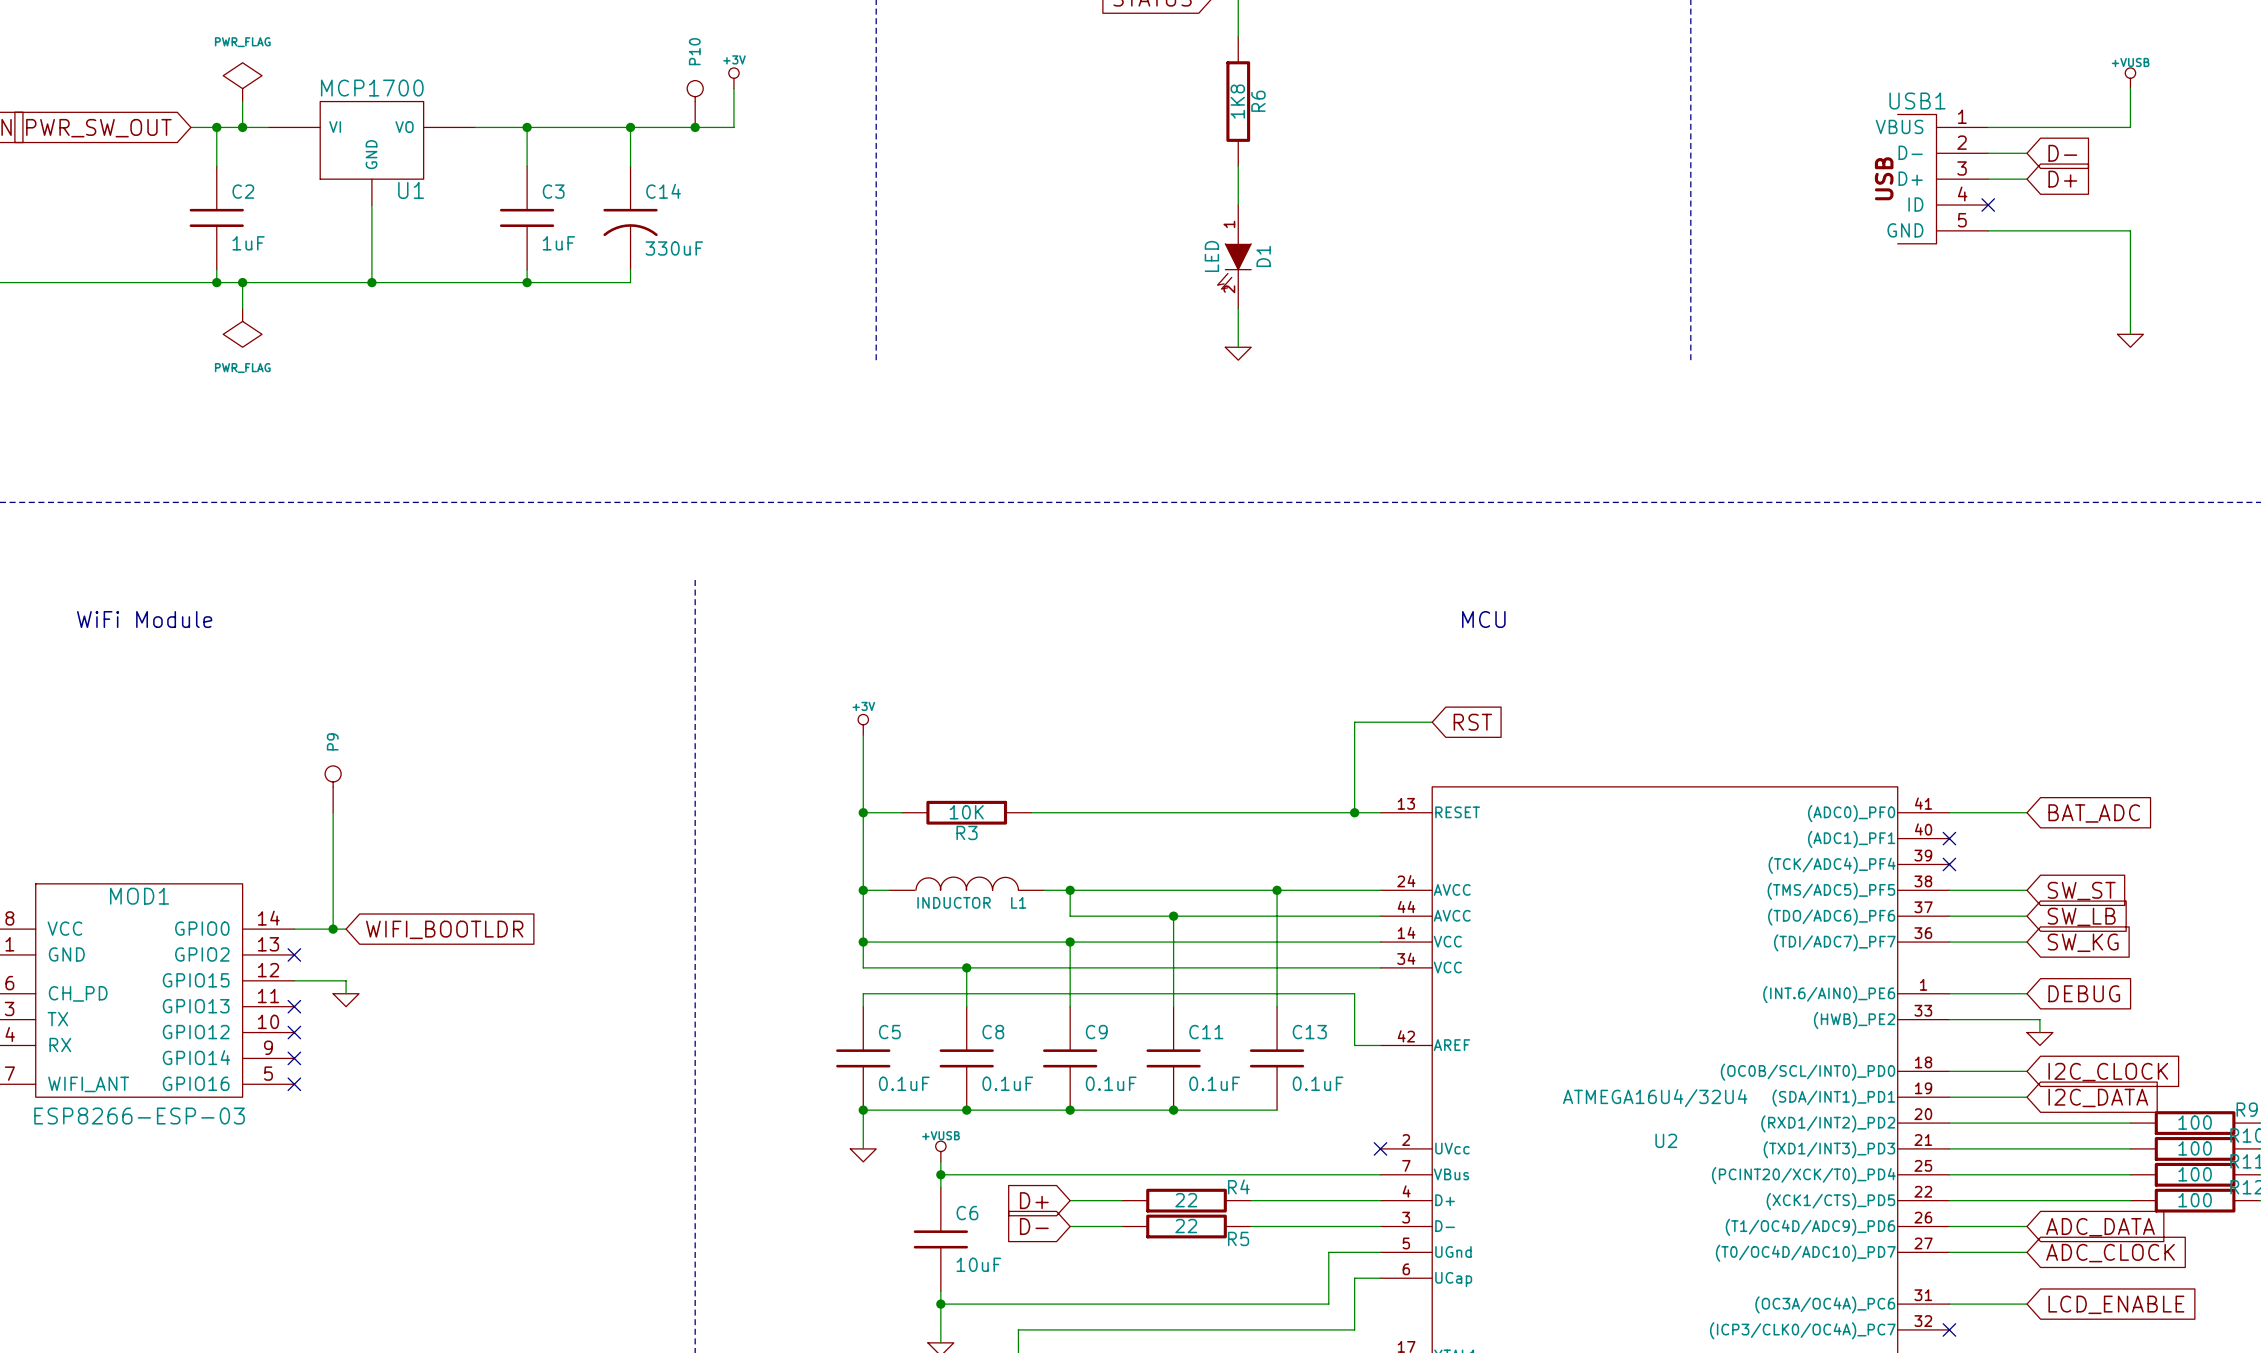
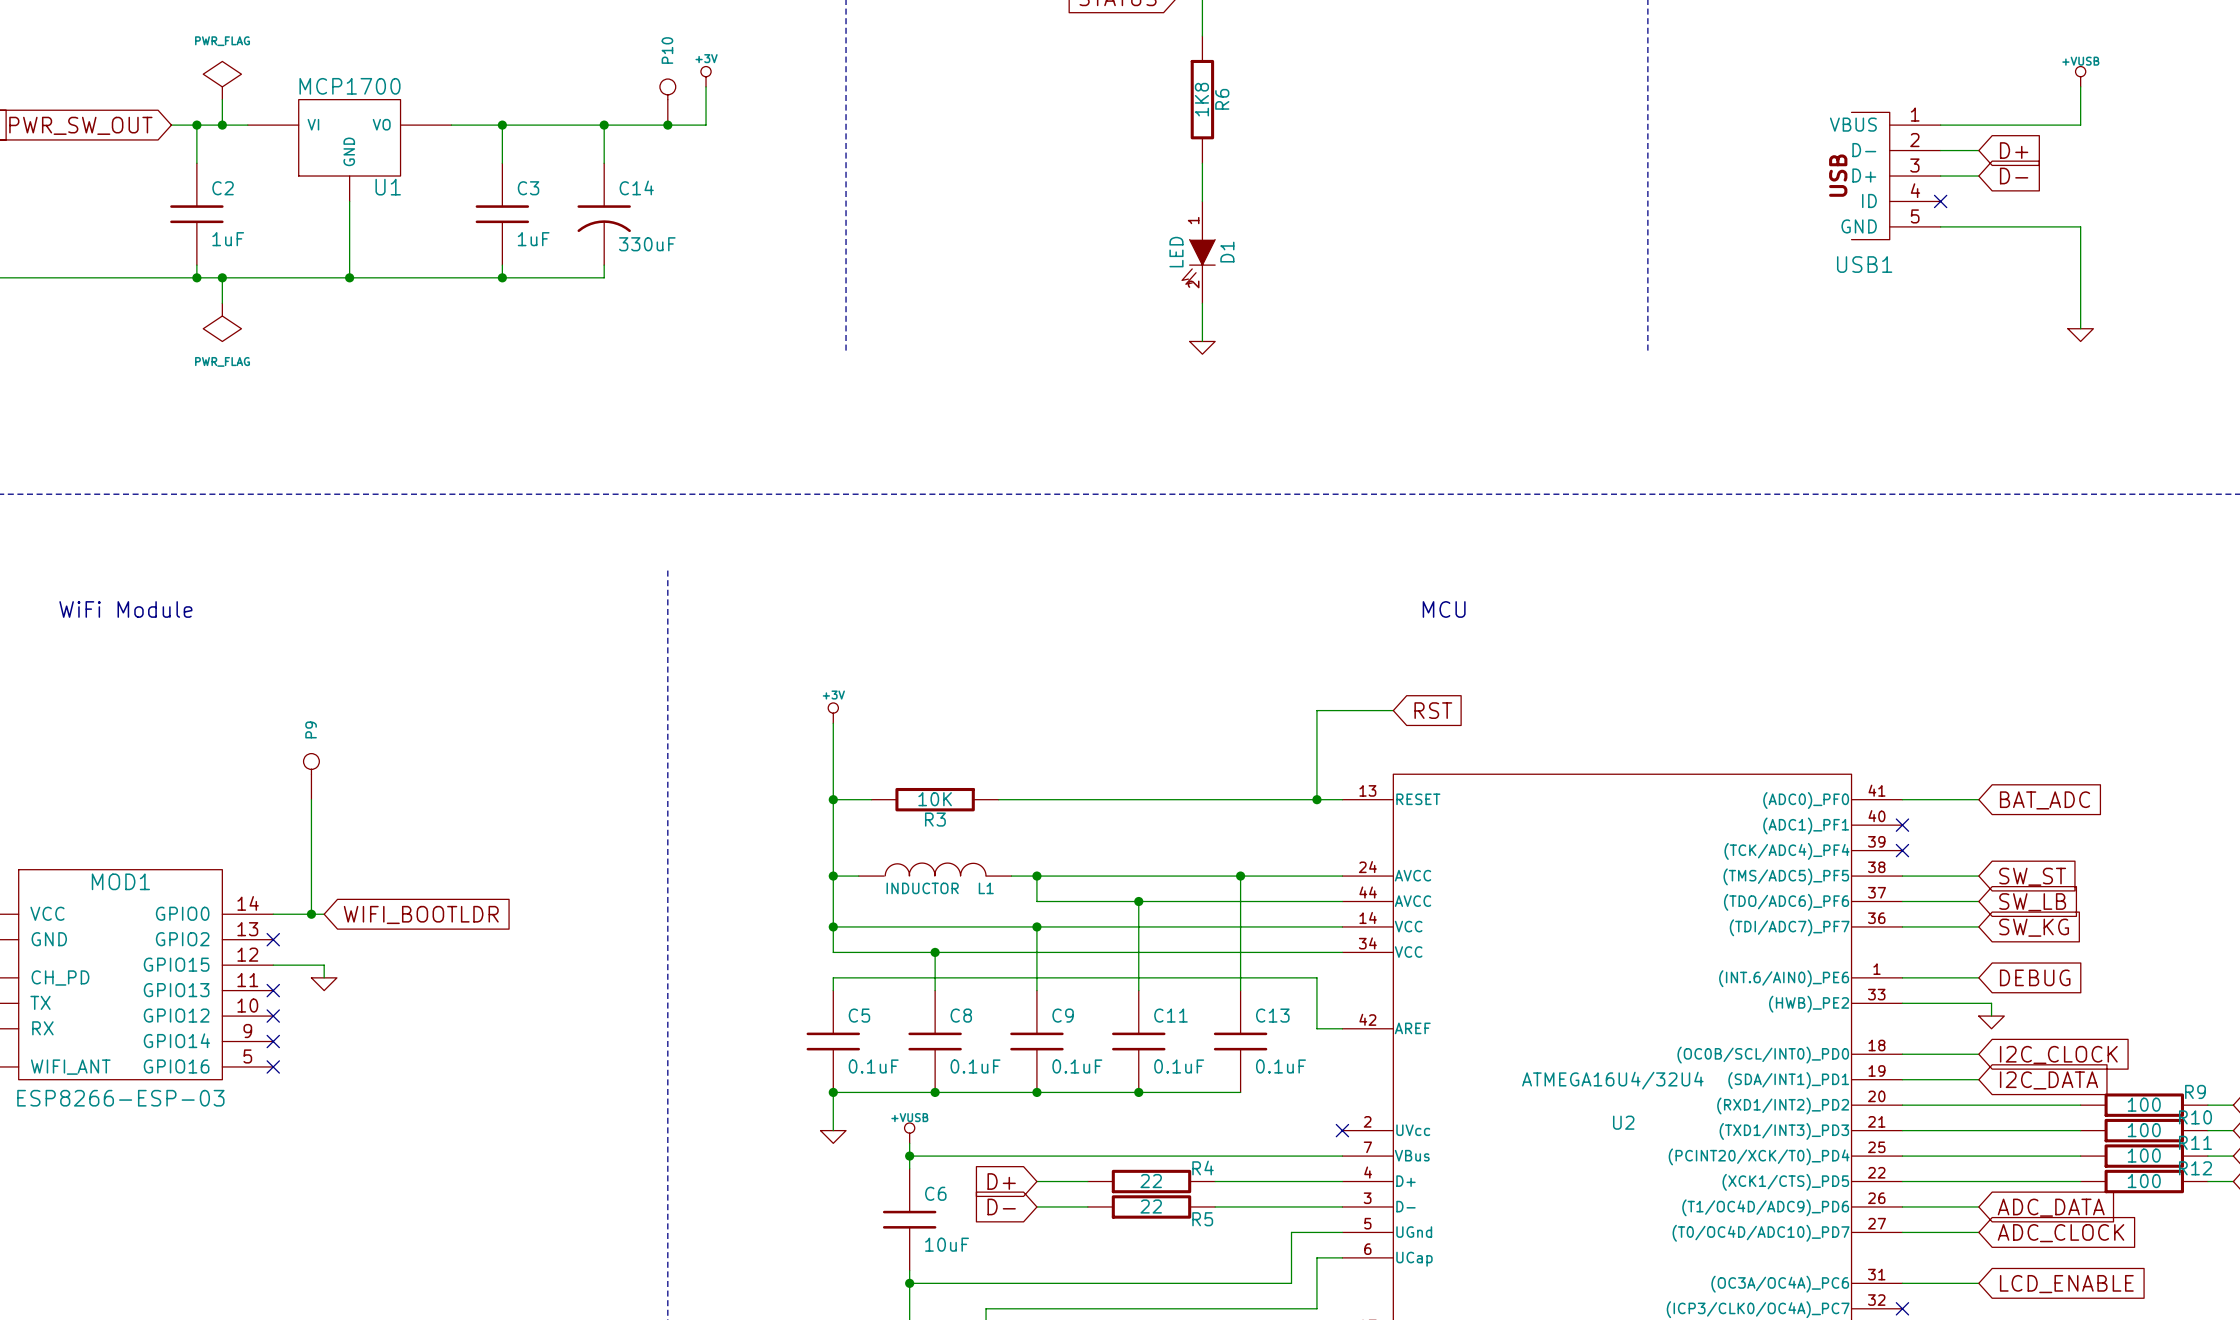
USB1 name position: USB1 (1917, 100) -> USB1 (1864, 264)
global label: D- (2062, 153) -> D+ (2014, 150)
global label: D+ (2062, 179) -> D- (2014, 176)

